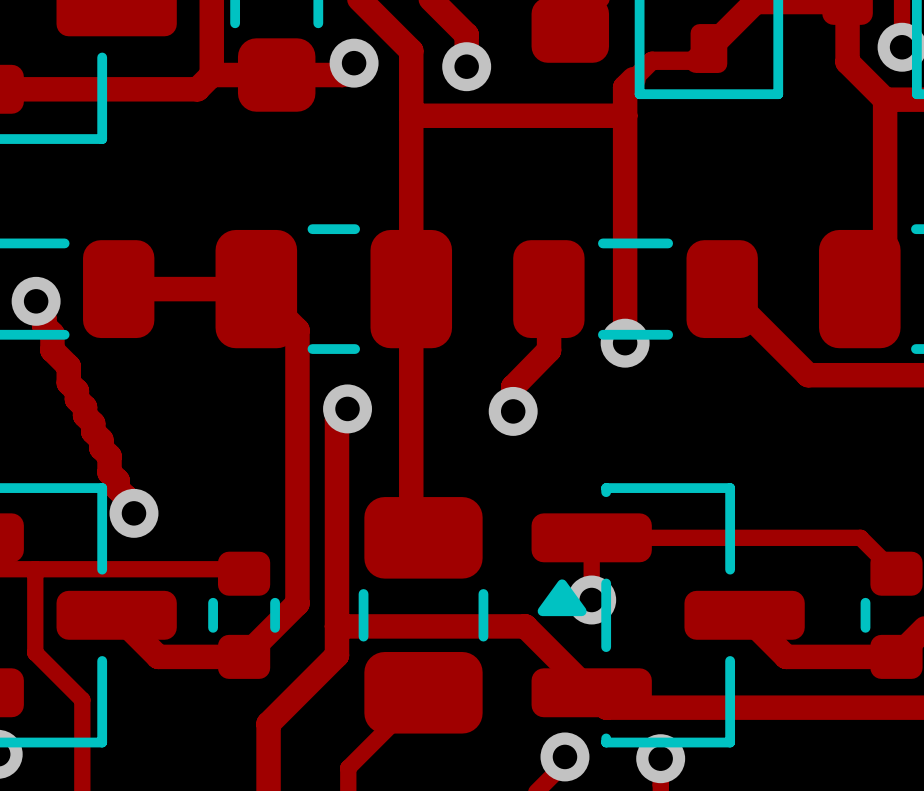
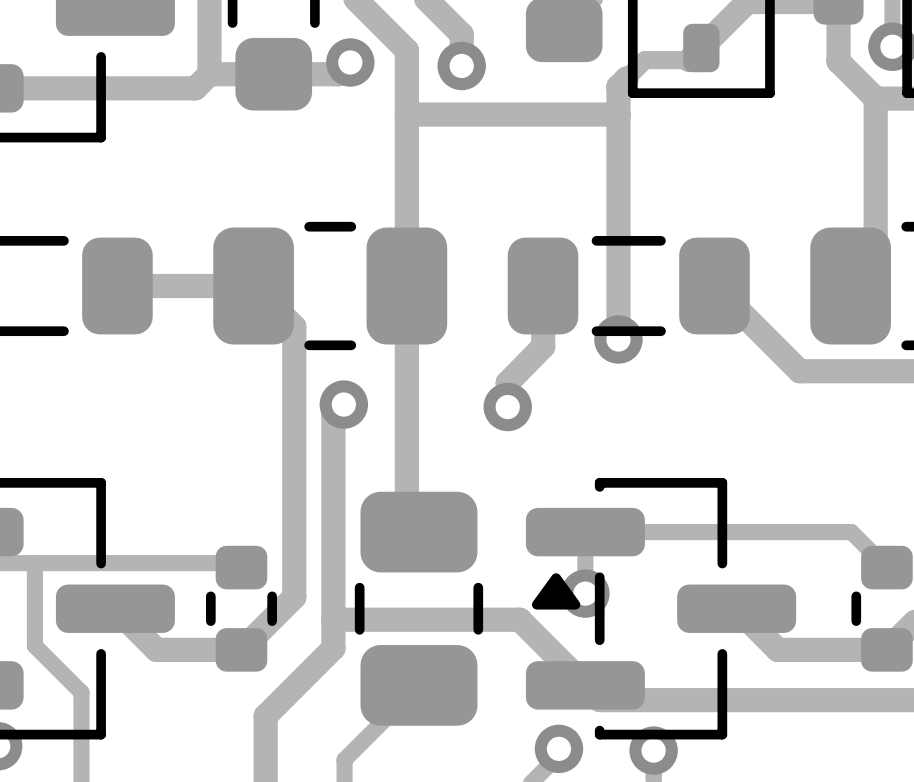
track: (36, 301) (36, 309) (44, 317) (44, 325) (52, 333) (52, 350) (68, 366) (68, 382) (76, 391) (76, 399) (85, 407) (85, 415) (93, 423) (93, 431) (101, 439) (101, 448) (109, 456) (109, 472) (117, 480) (117, 488) (125, 497) (125, 505) (133, 513) -> none
via: (36, 301) -> none
via: (133, 513) -> none

